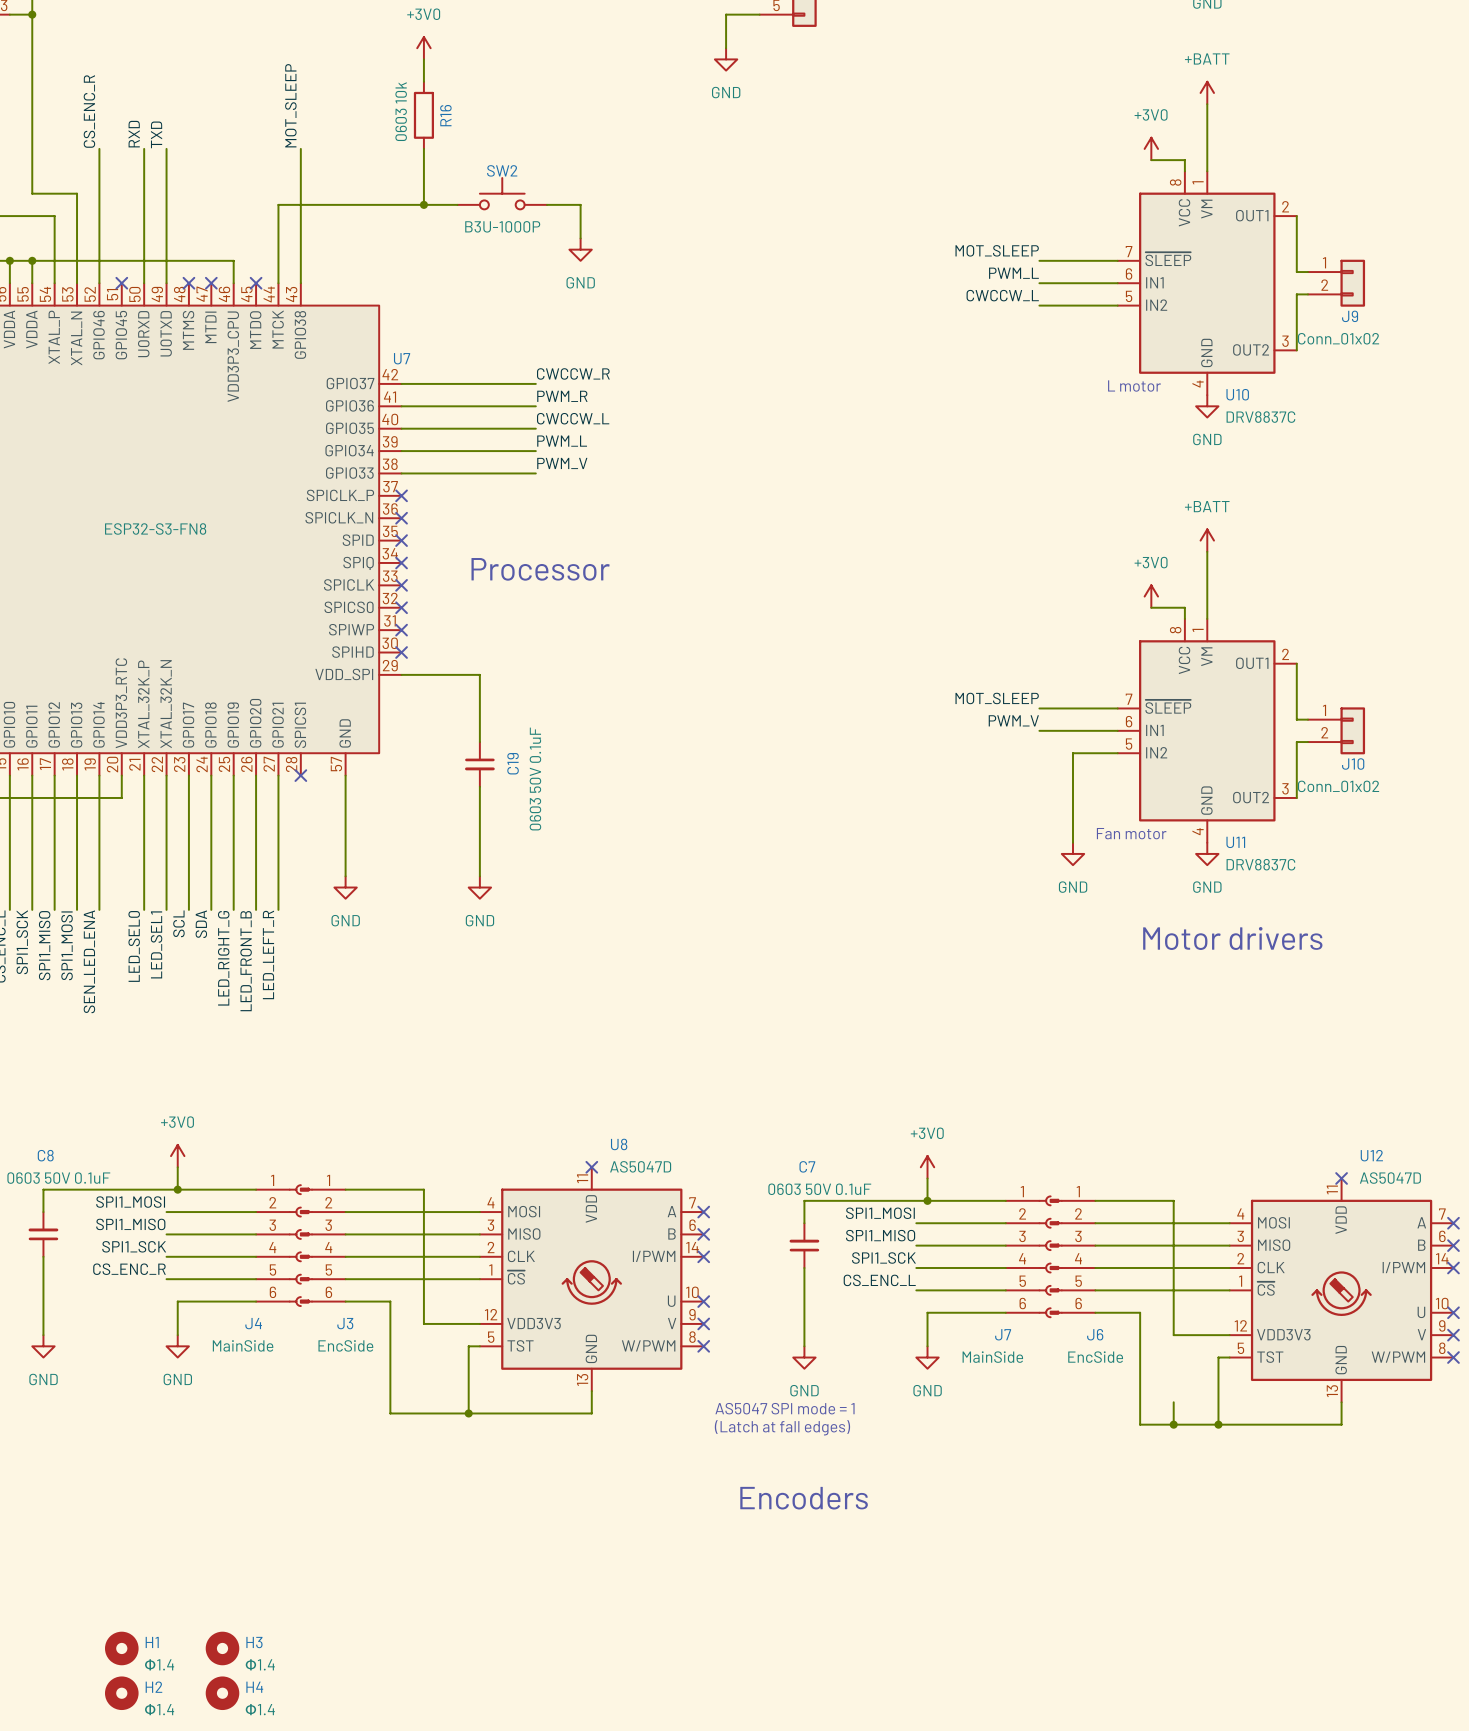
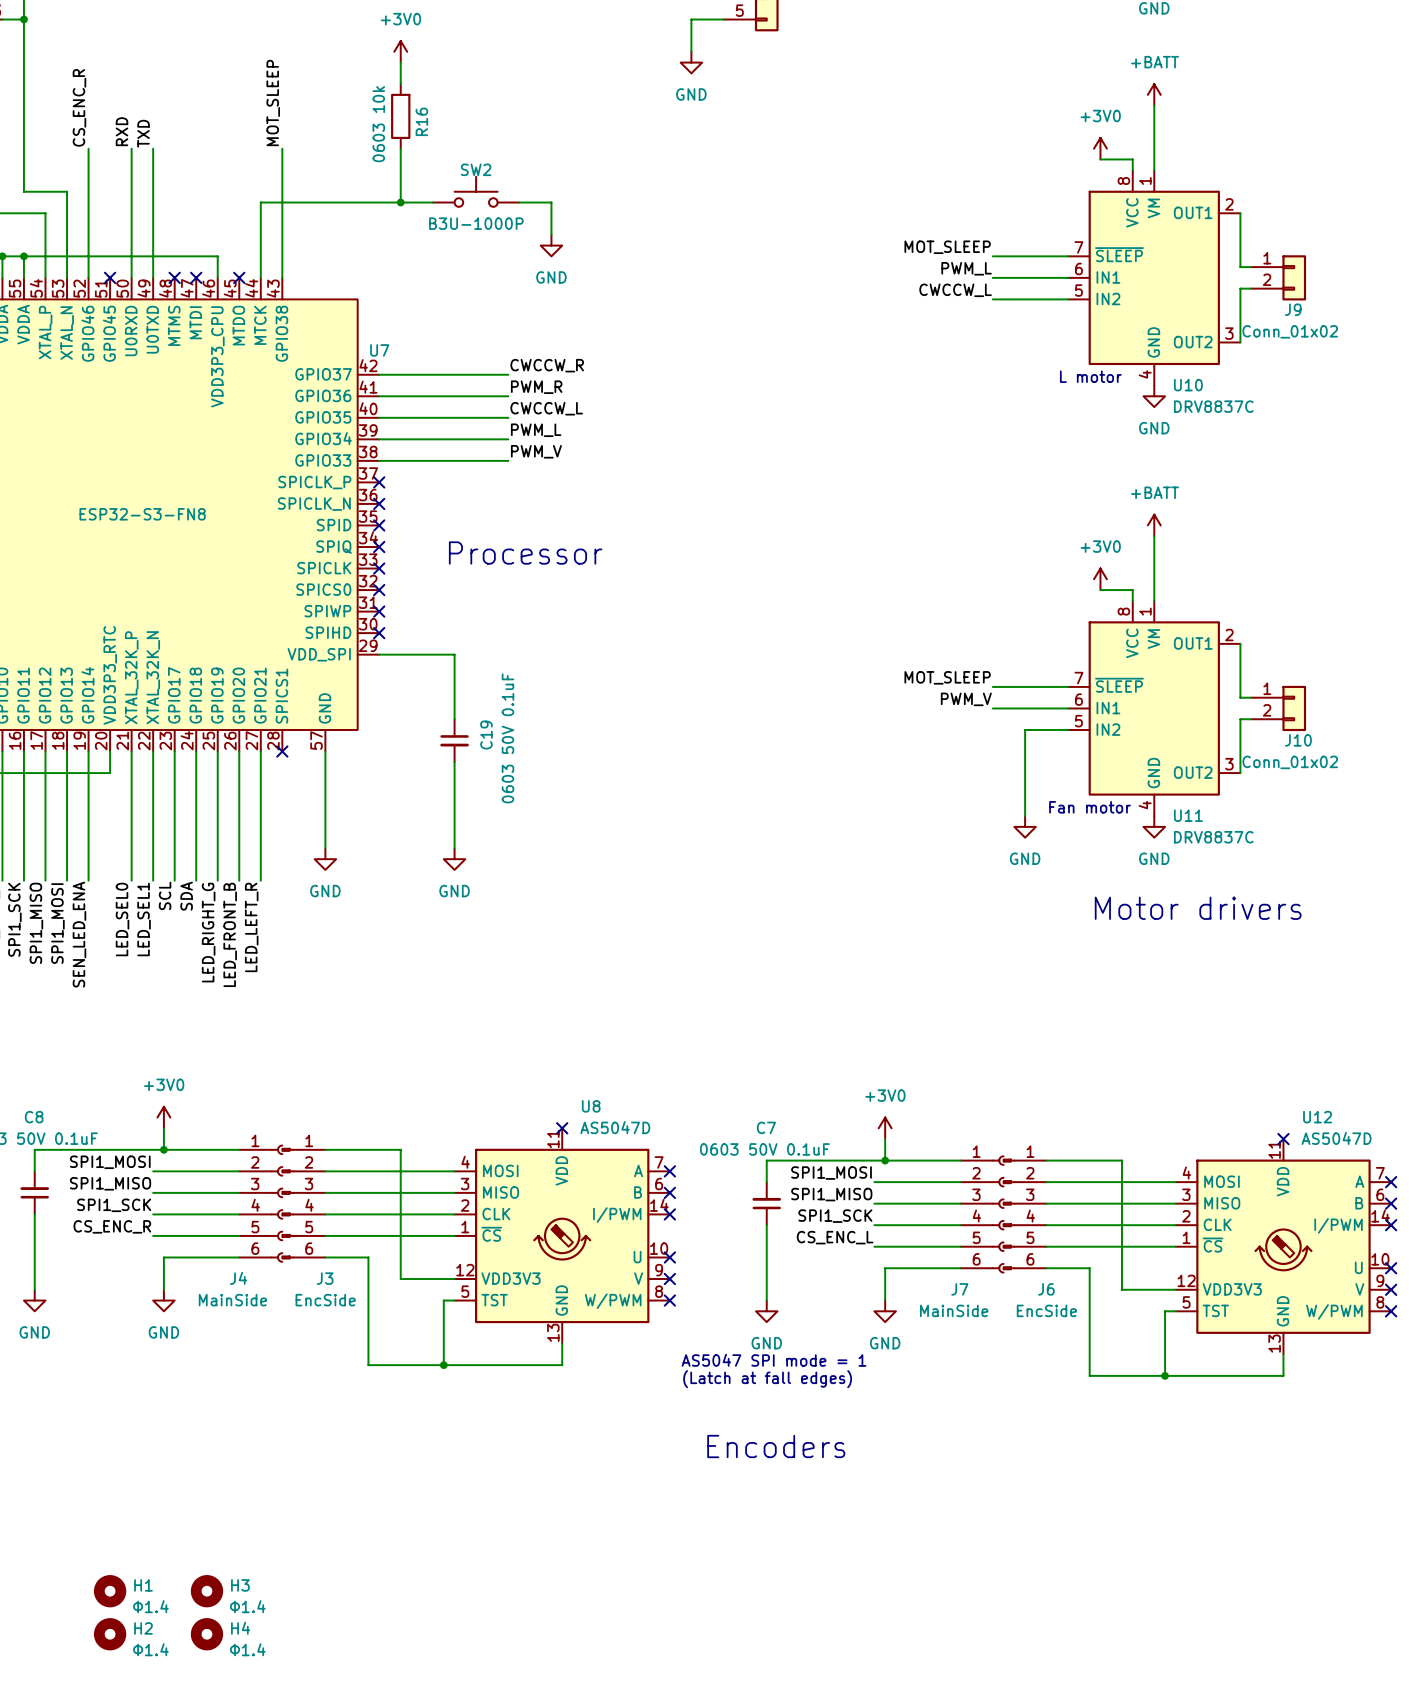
wire: (1173, 1402) (1173, 1424) -> none
junction: (1173, 1424) -> none

